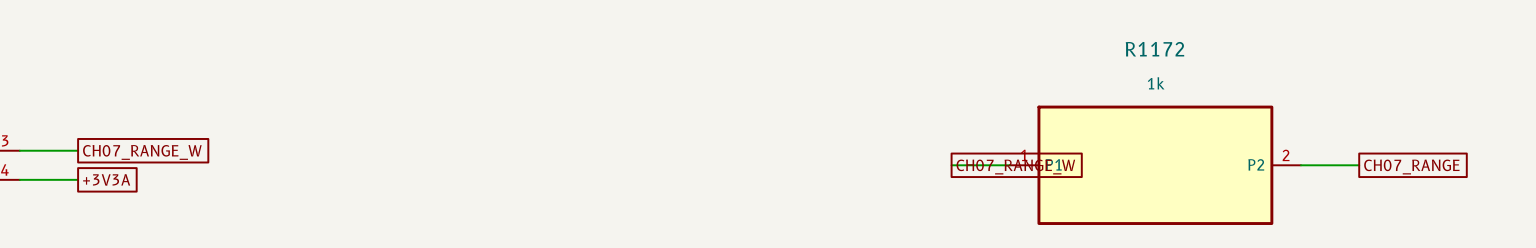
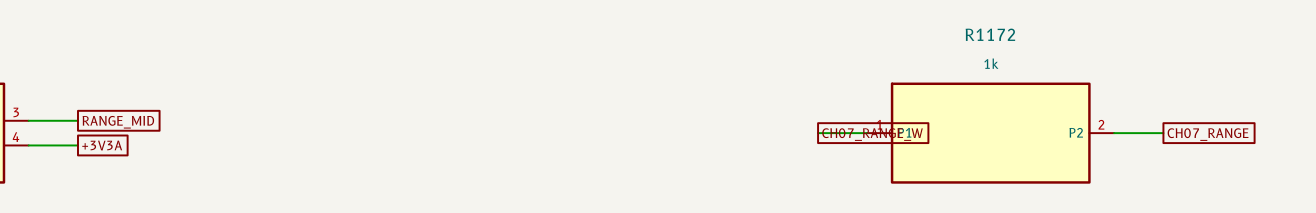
global label: CH07_RANGE_W (142, 152) -> RANGE_MID (118, 122)

